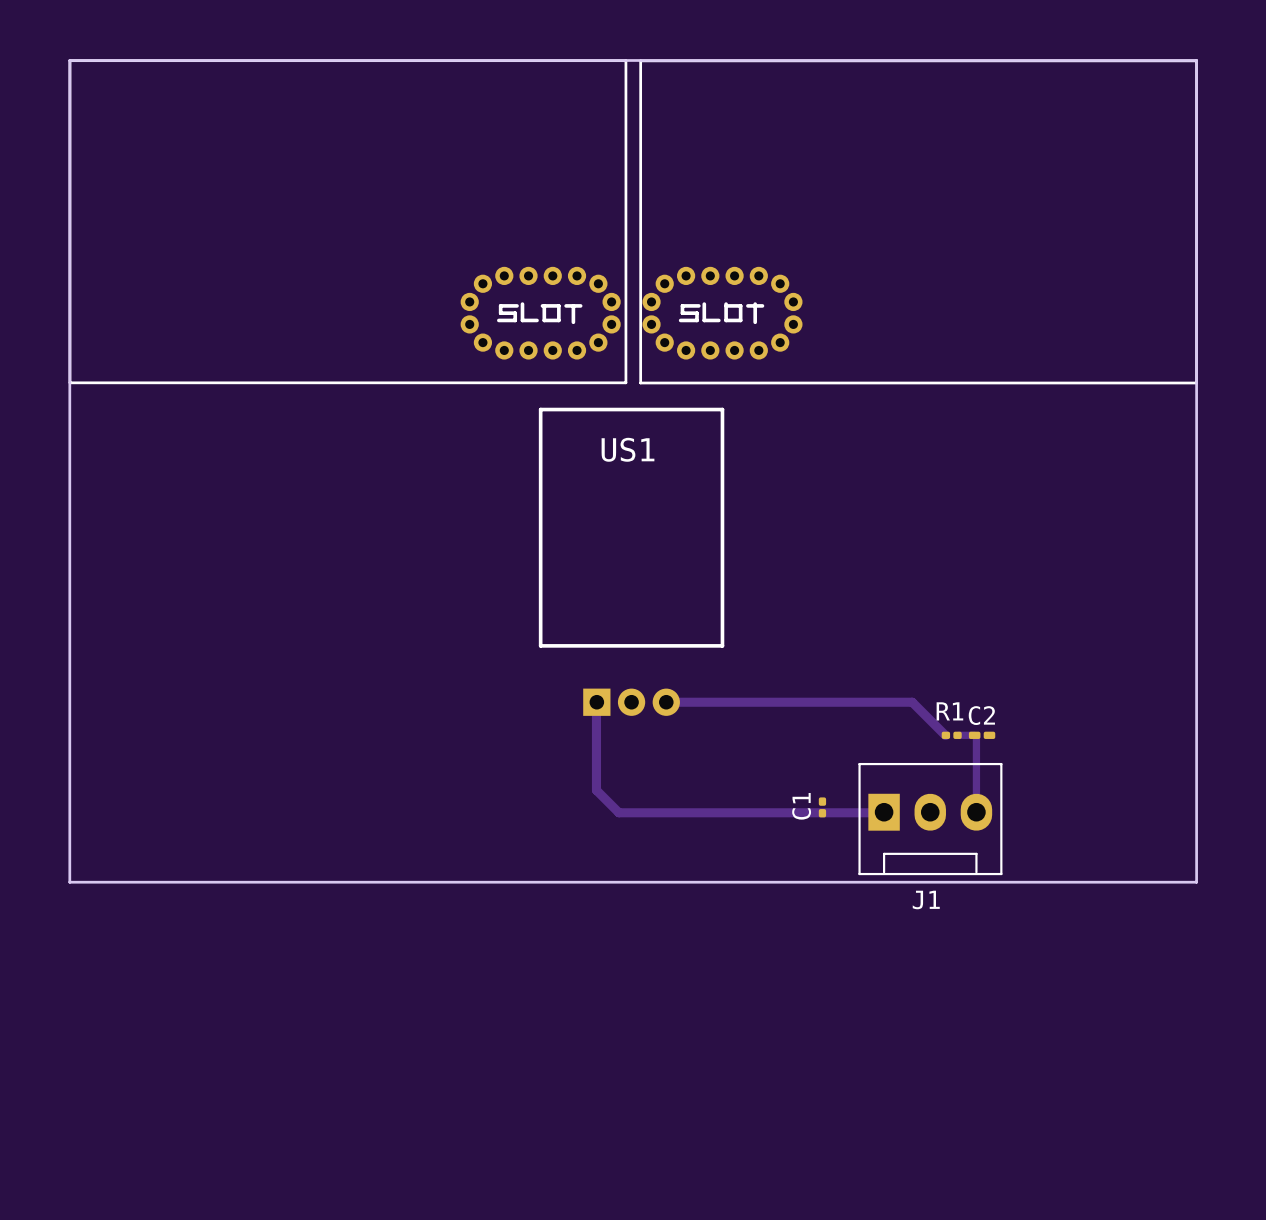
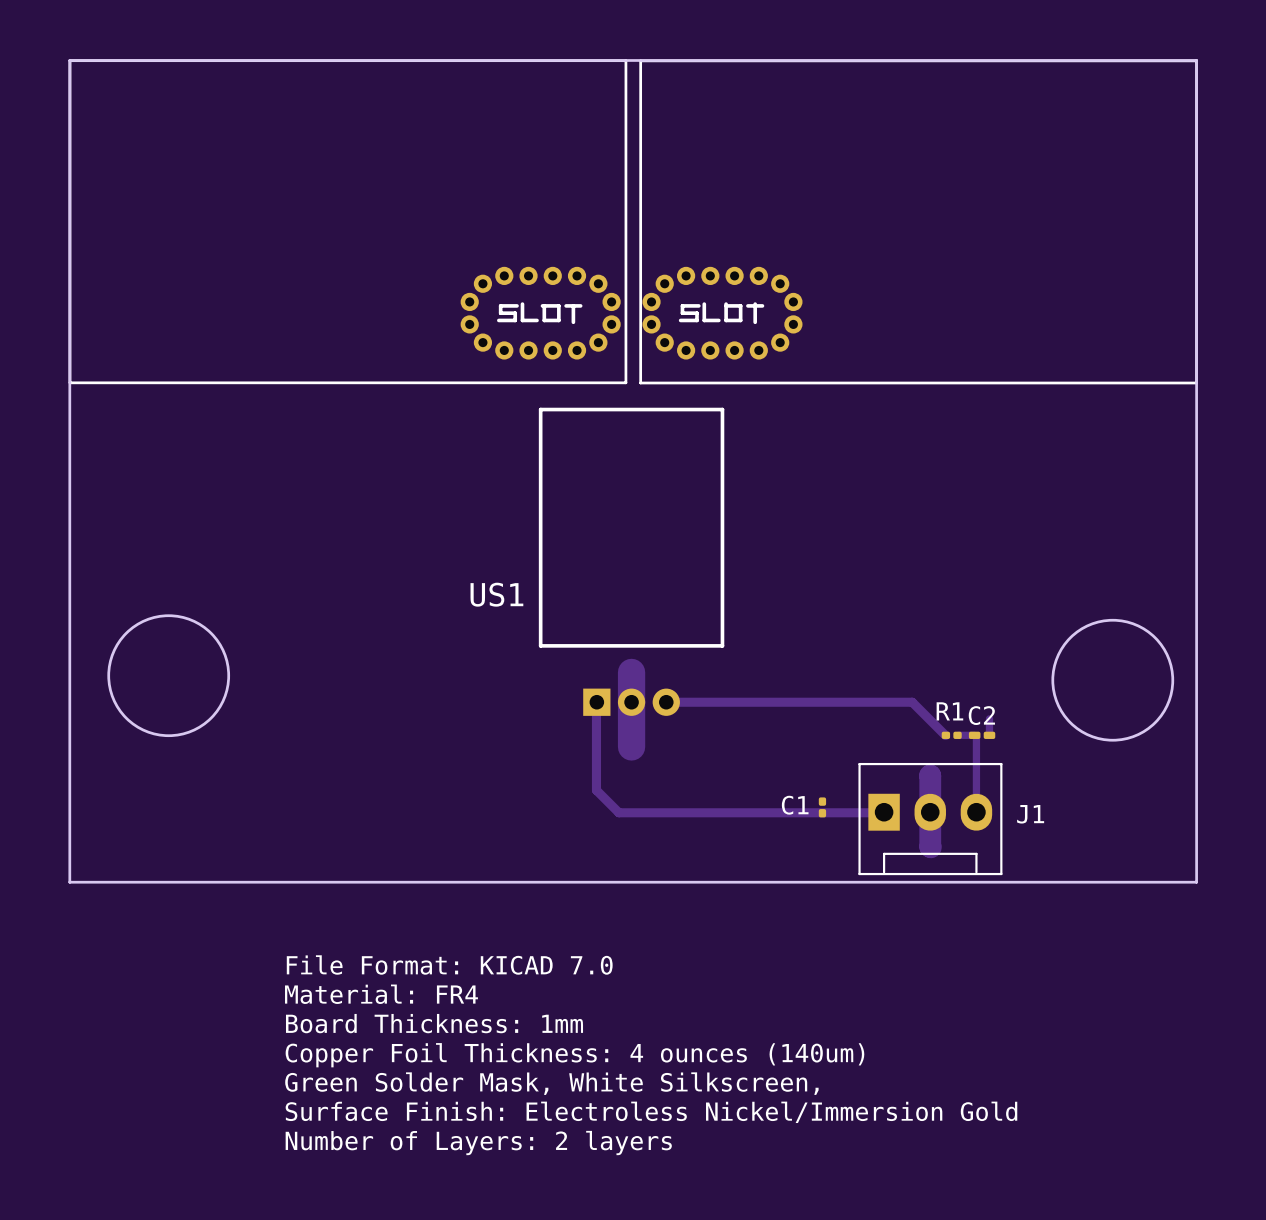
US1 name position: US1 (627, 449) -> US1 (496, 594)
round board edge: none -> [107, 614, 231, 738]
round board edge: none -> [1051, 618, 1175, 742]
track: none -> (631, 672) (631, 746)
track: none -> (989, 718) (989, 735)
track: none -> (930, 775) (930, 847)
C1 name rotation: 0° (801, 806) -> 90° clockwise (795, 805)
J1 name position: J1 (926, 899) -> J1 (1030, 814)
text: none -> File Format: KICAD 7.0 (449, 964)
text: none -> Material: FR4 (381, 994)
text: none -> Board Thickness: 1mm (434, 1023)
text: none -> Copper Foil Thickness: 4 ounces (140um) (574, 1055)
text: none -> Green Solder Mask, White Silkscreen, (551, 1083)
text: none -> Surface Finish: Electroless Nickel/Immersion Gold (651, 1112)
text: none -> Number of Layers: 2 layers (478, 1143)

